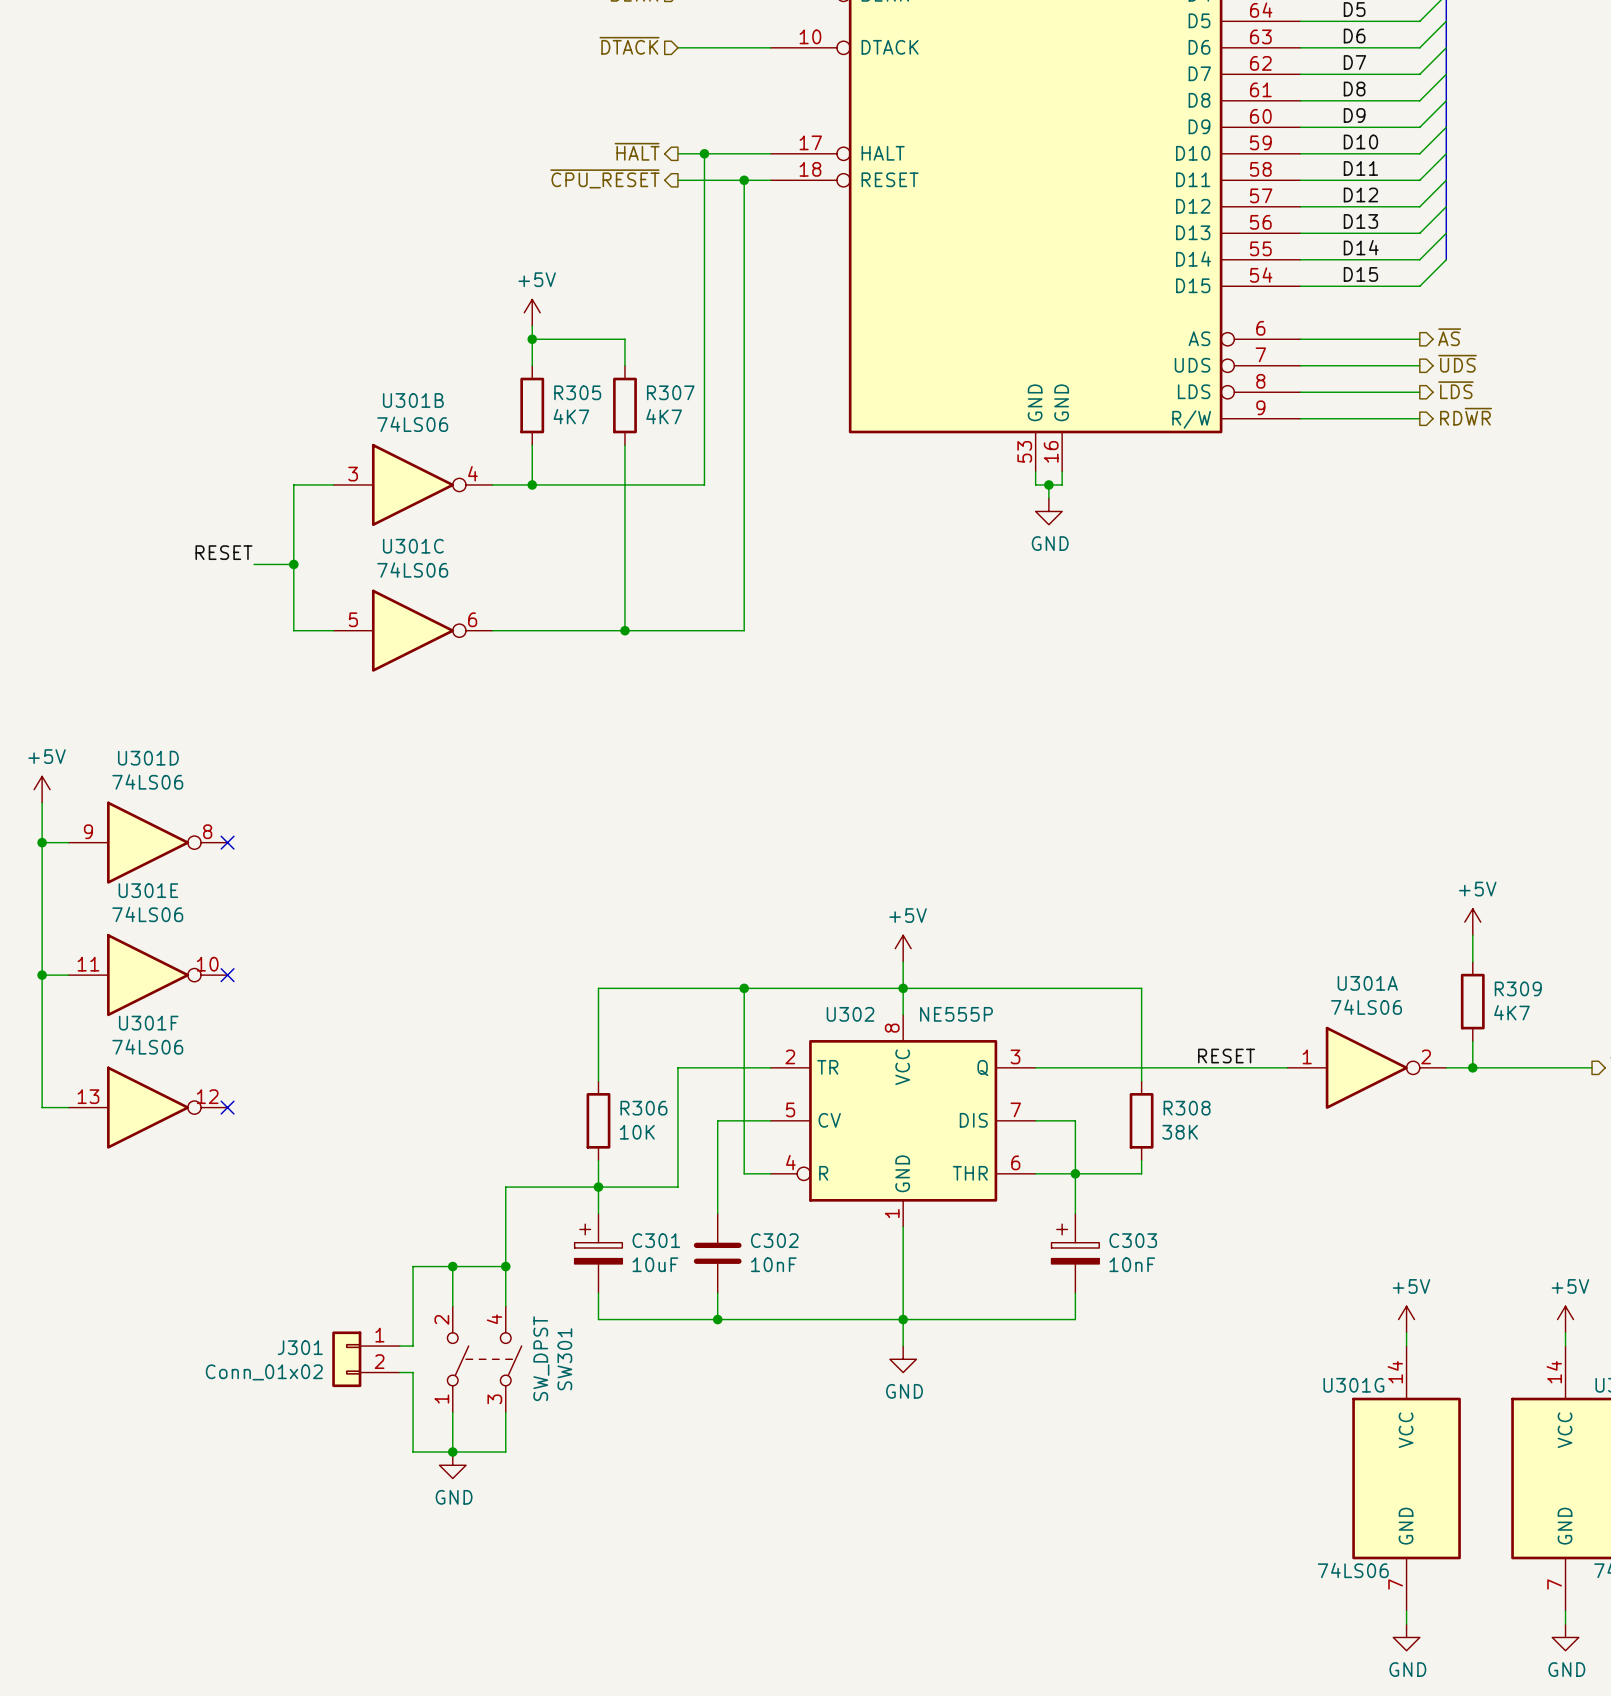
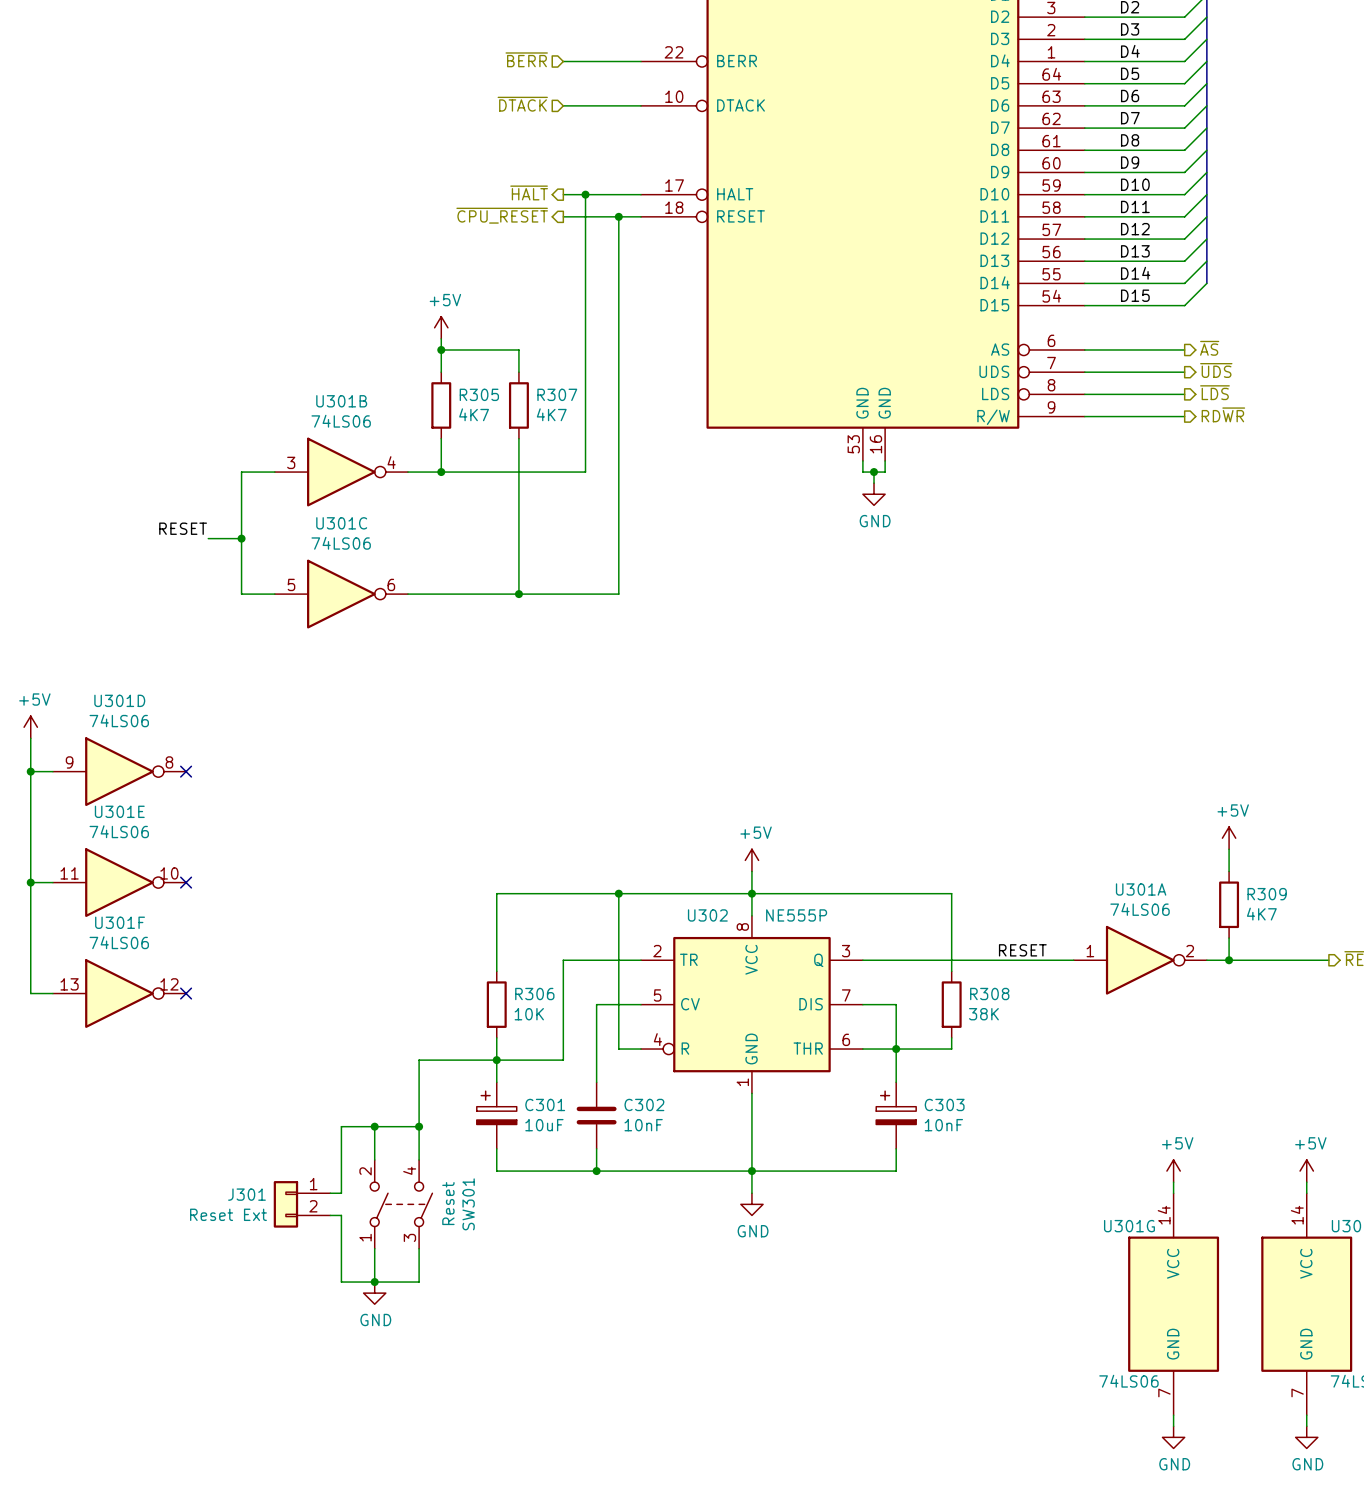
SW301 value: SW_DPST (541, 1358) -> Reset (448, 1203)
J301 value: Conn_01x02 (264, 1372) -> Reset Ext (228, 1214)

